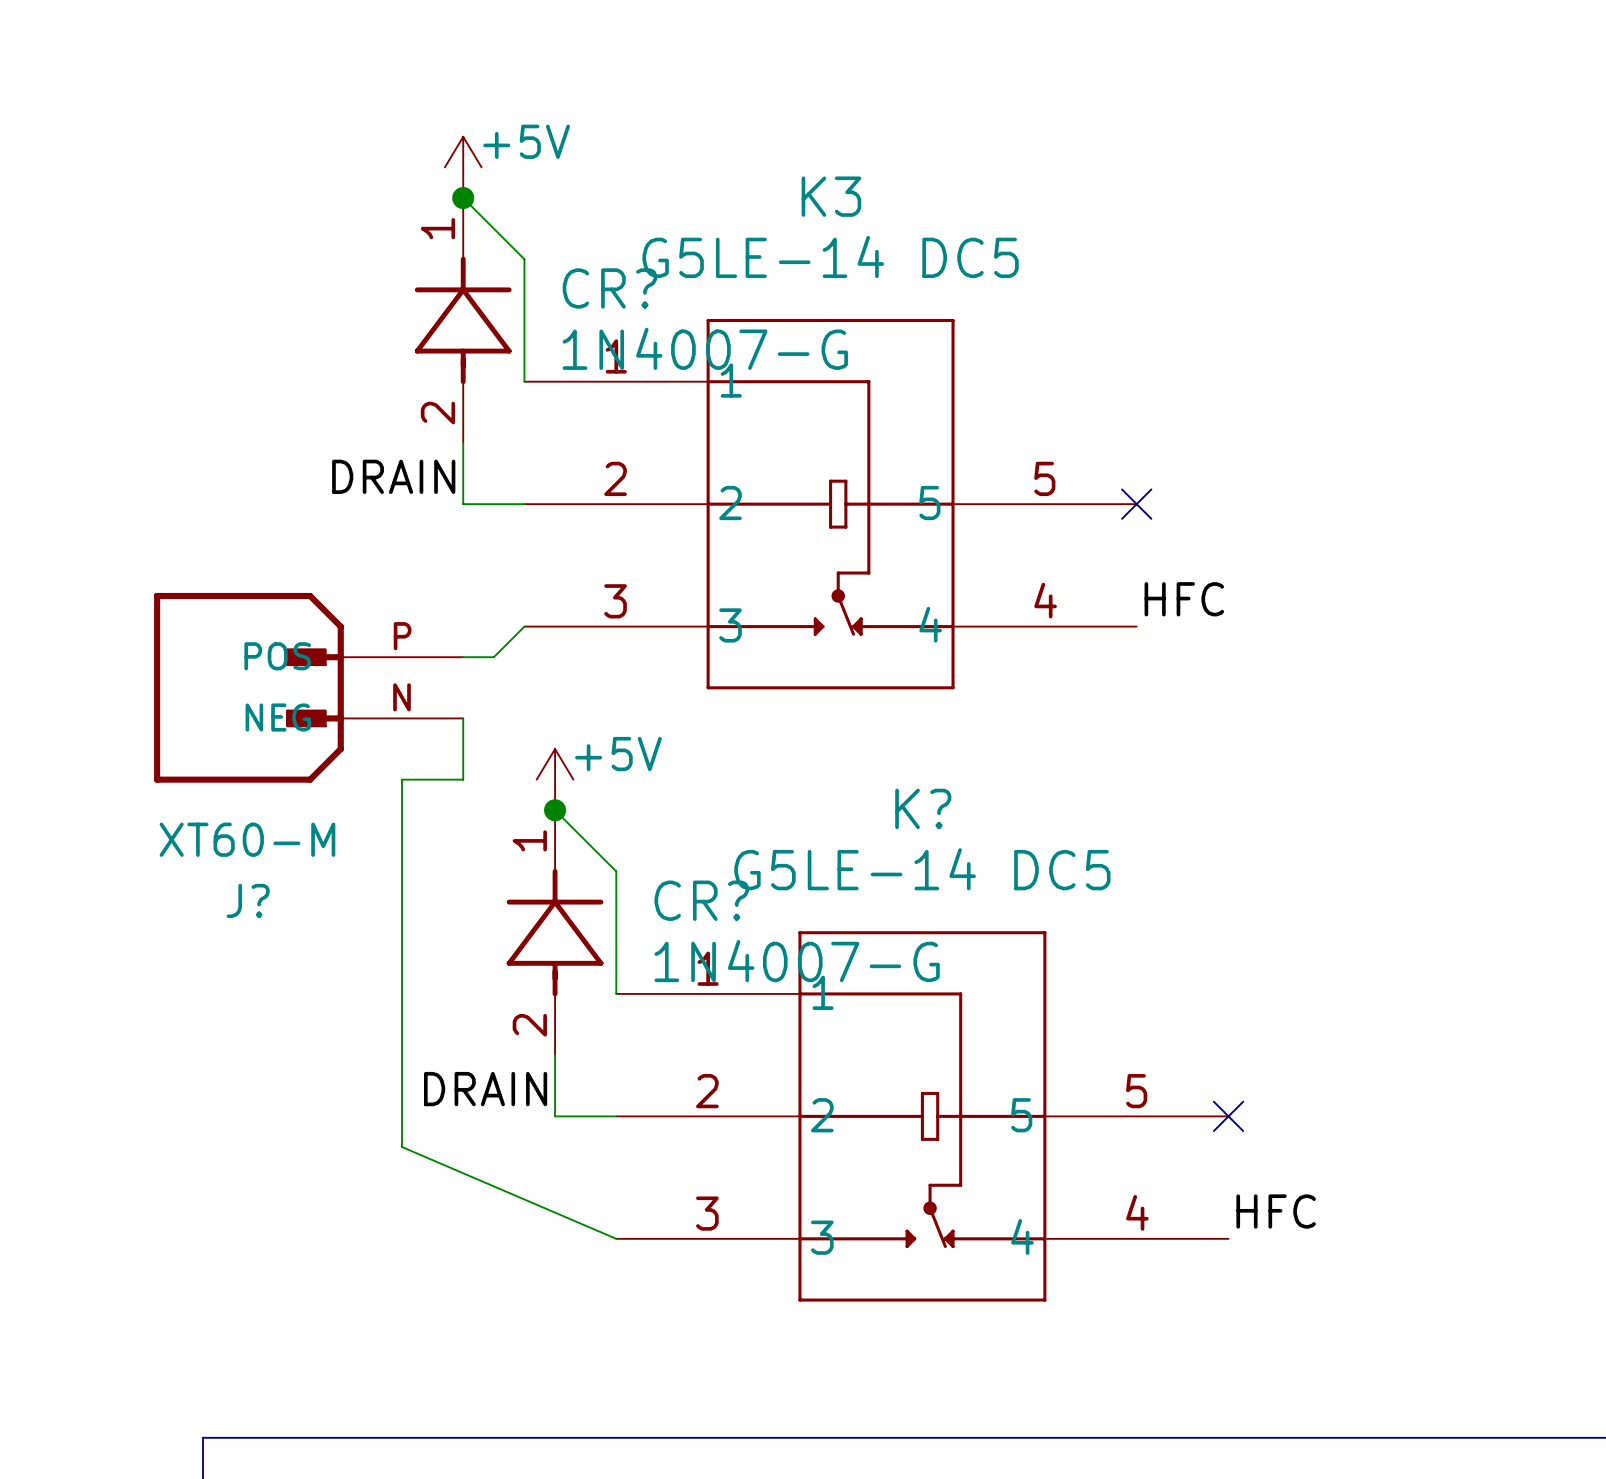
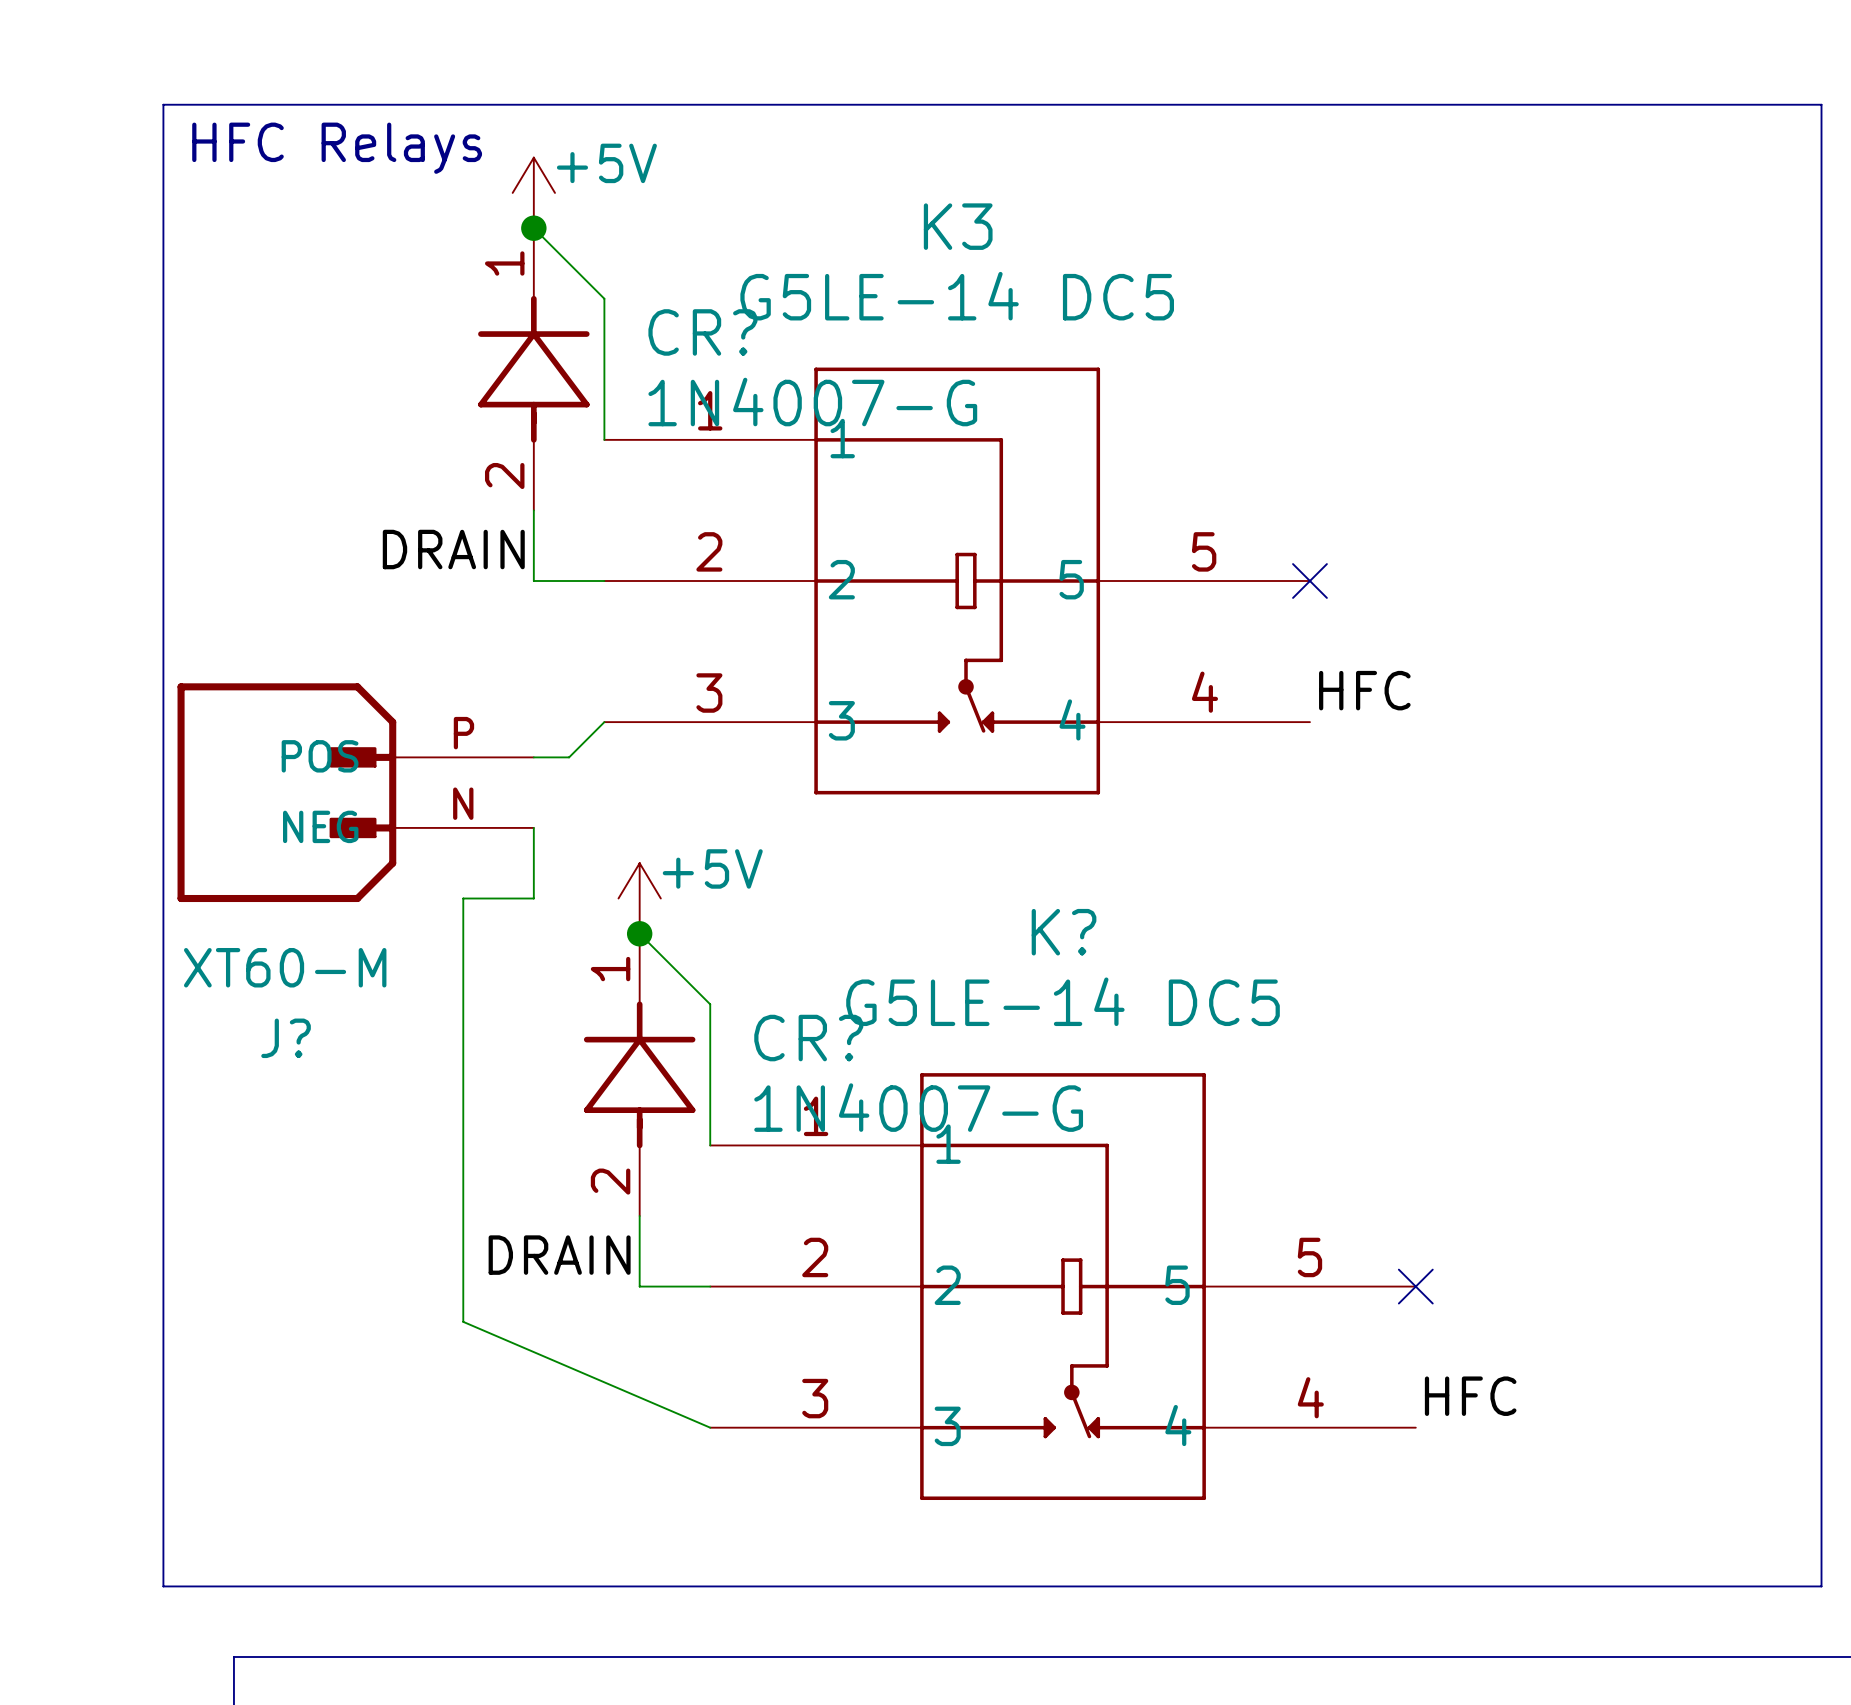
line: none -> (163, 104) (1821, 104) (1821, 1586) (163, 1586) (163, 104)
text: none -> HFC Relays (337, 148)

